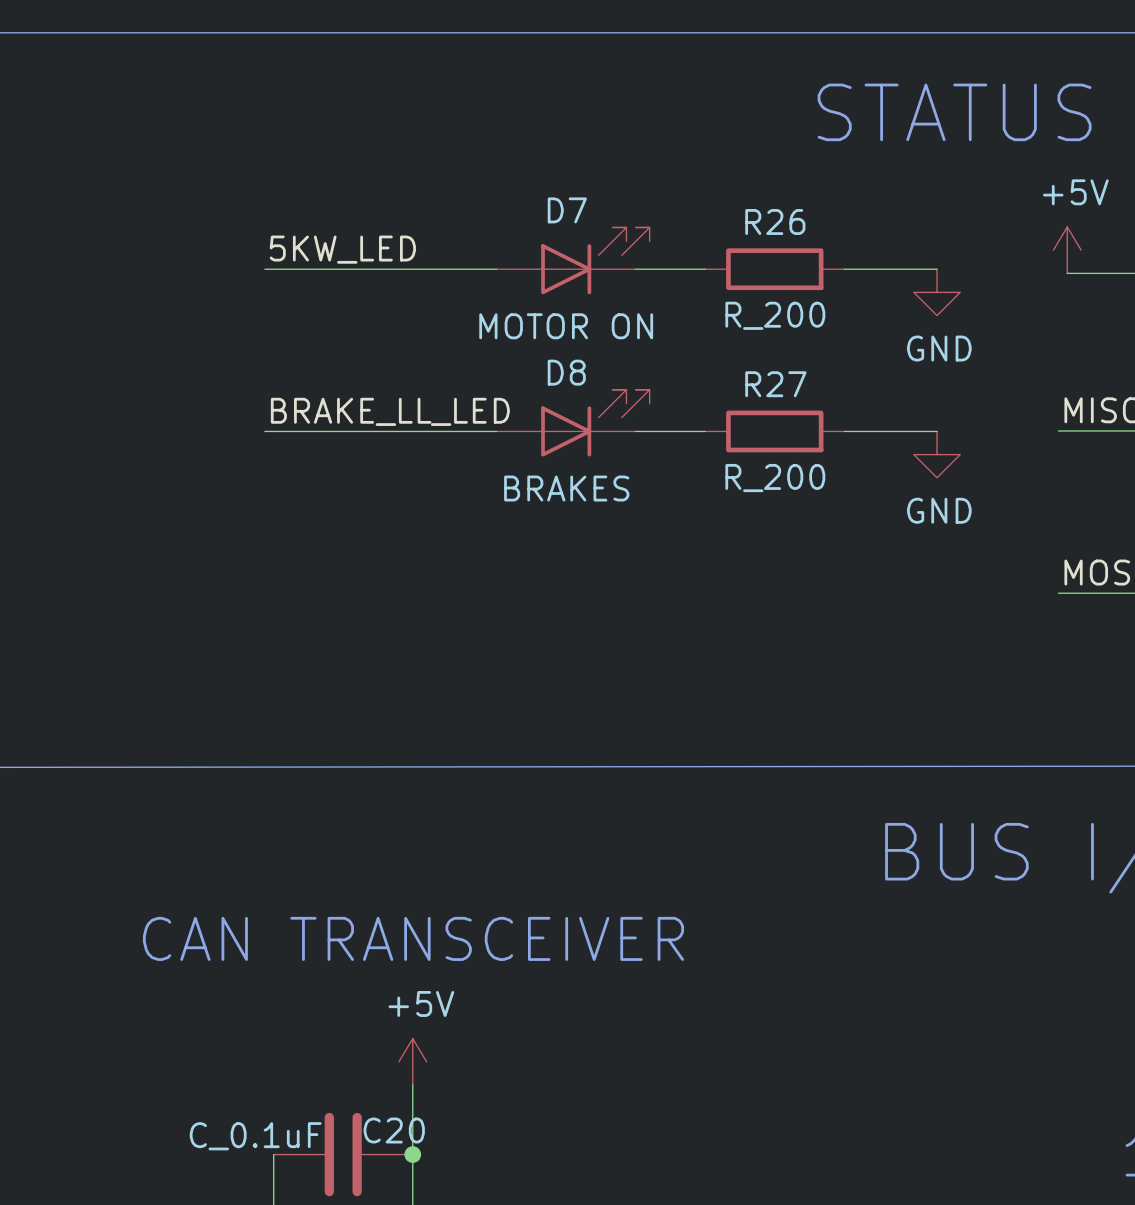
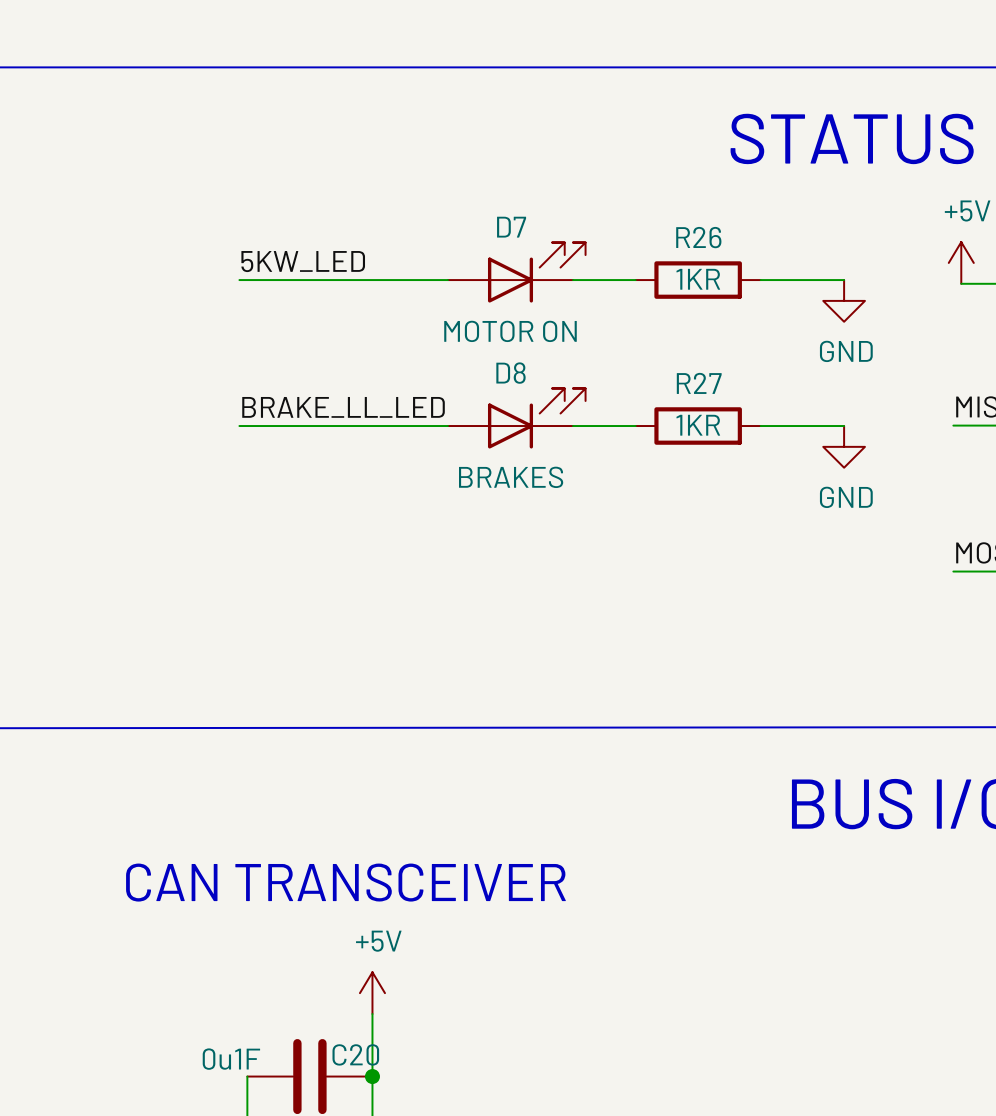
R26 value: R_200 (775, 315) -> 1KR (698, 279)
R27 value: R_200 (775, 478) -> 1KR (698, 425)
C20 value: C_0.1uF (255, 1136) -> 0u1F (231, 1059)

